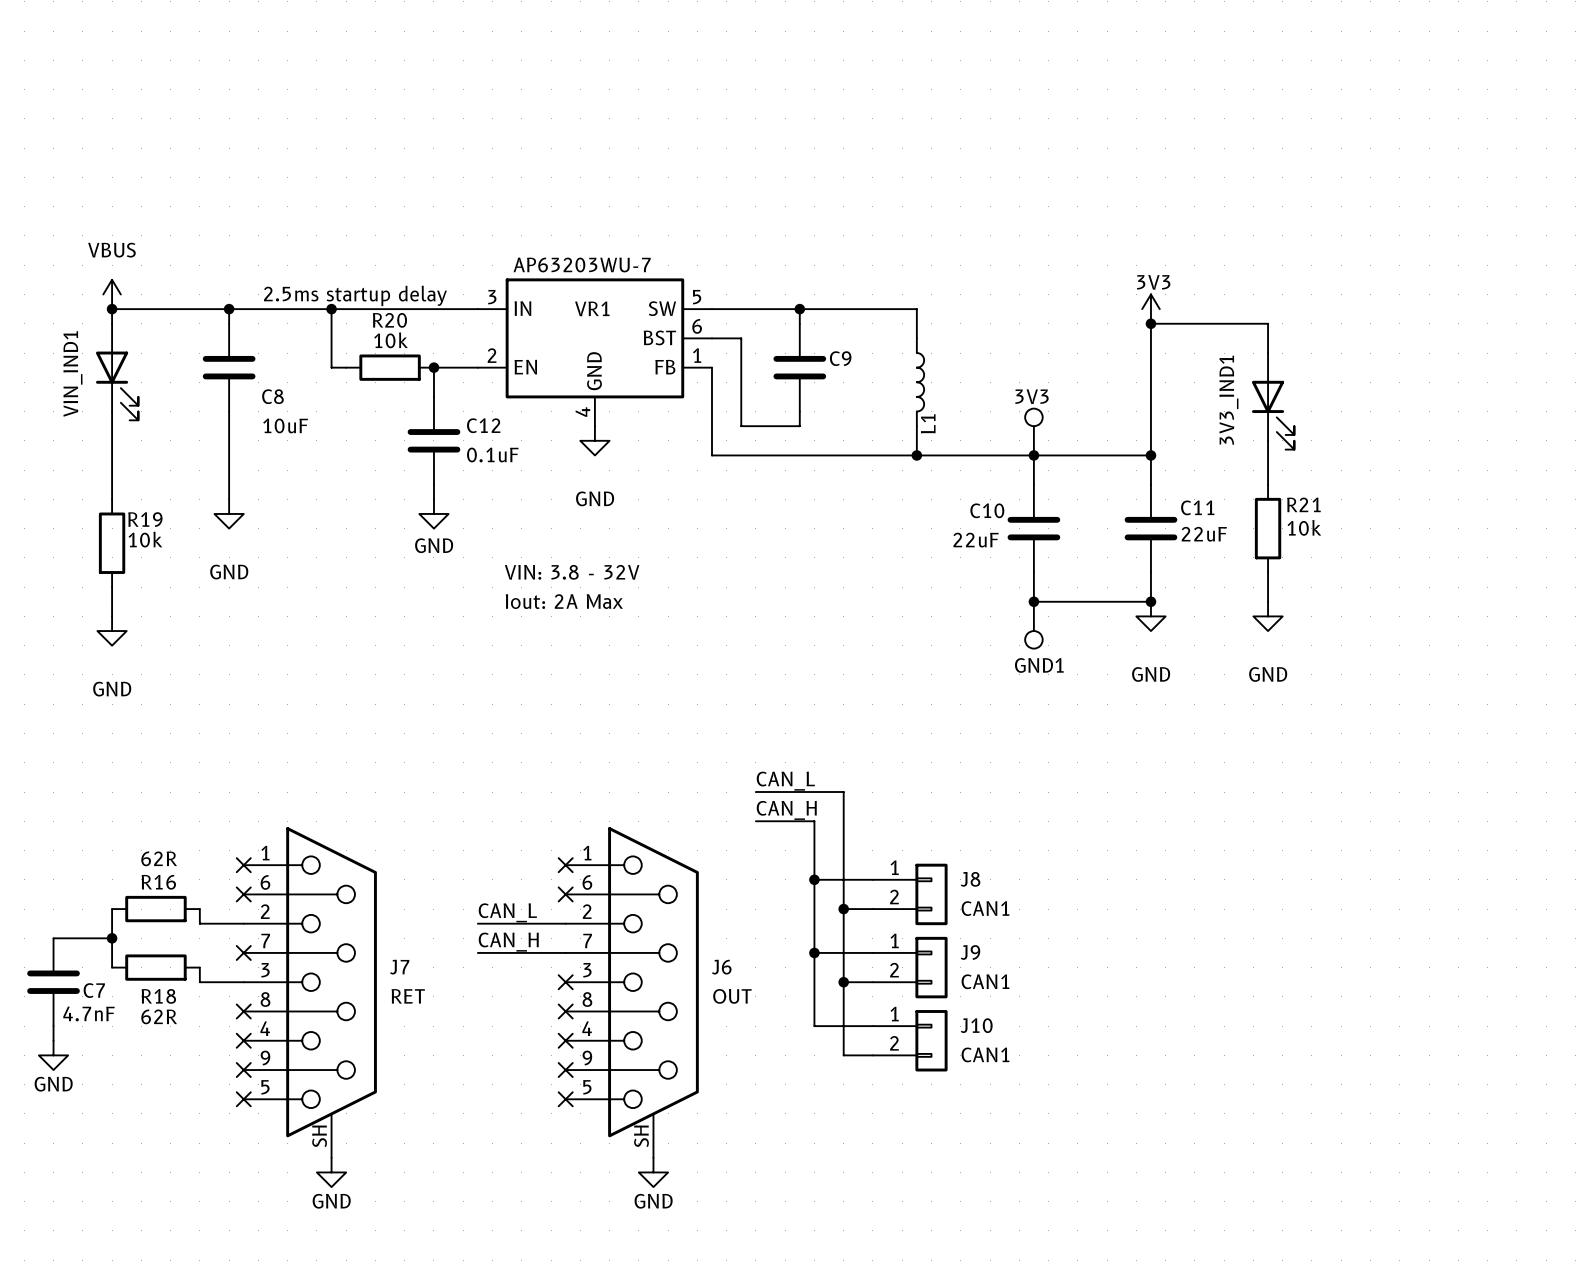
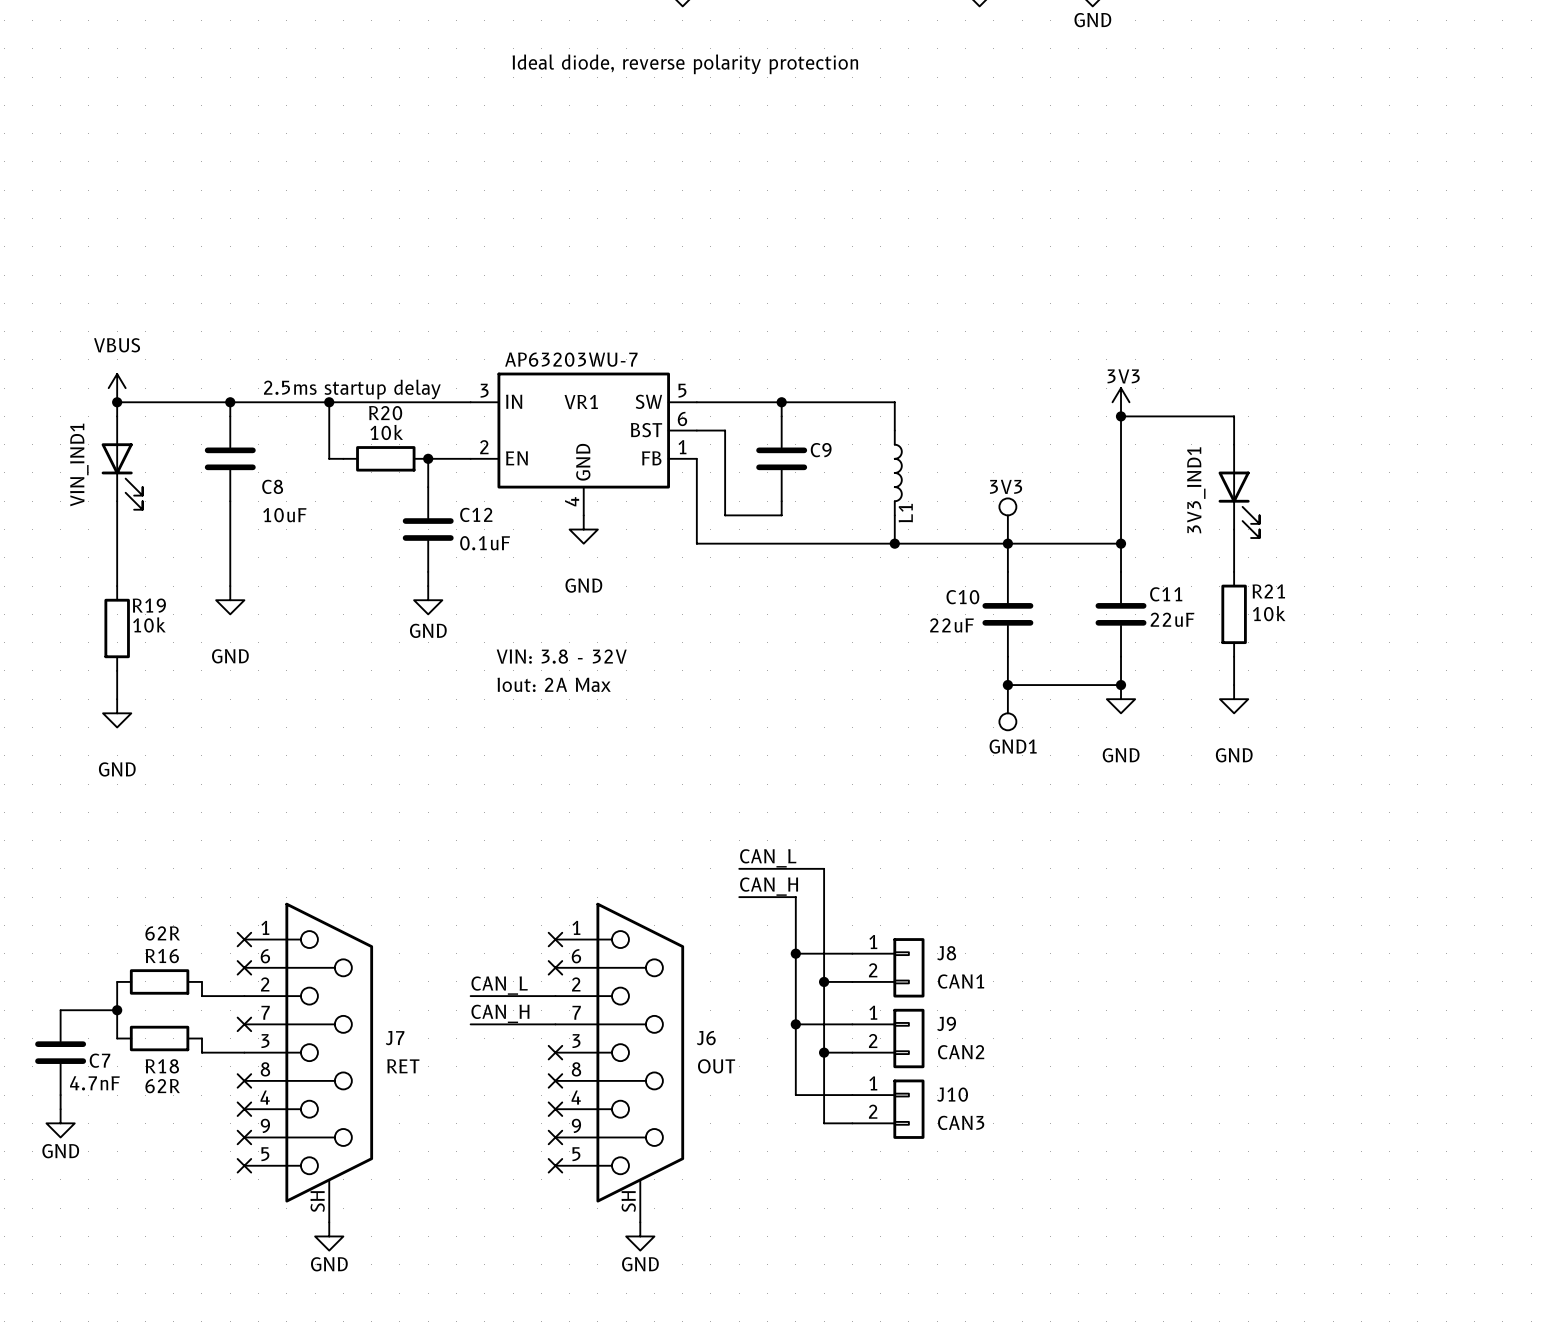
J9 value: CAN1 (985, 981) -> CAN2 (961, 1052)
J10 value: CAN1 (985, 1054) -> CAN3 (961, 1122)

